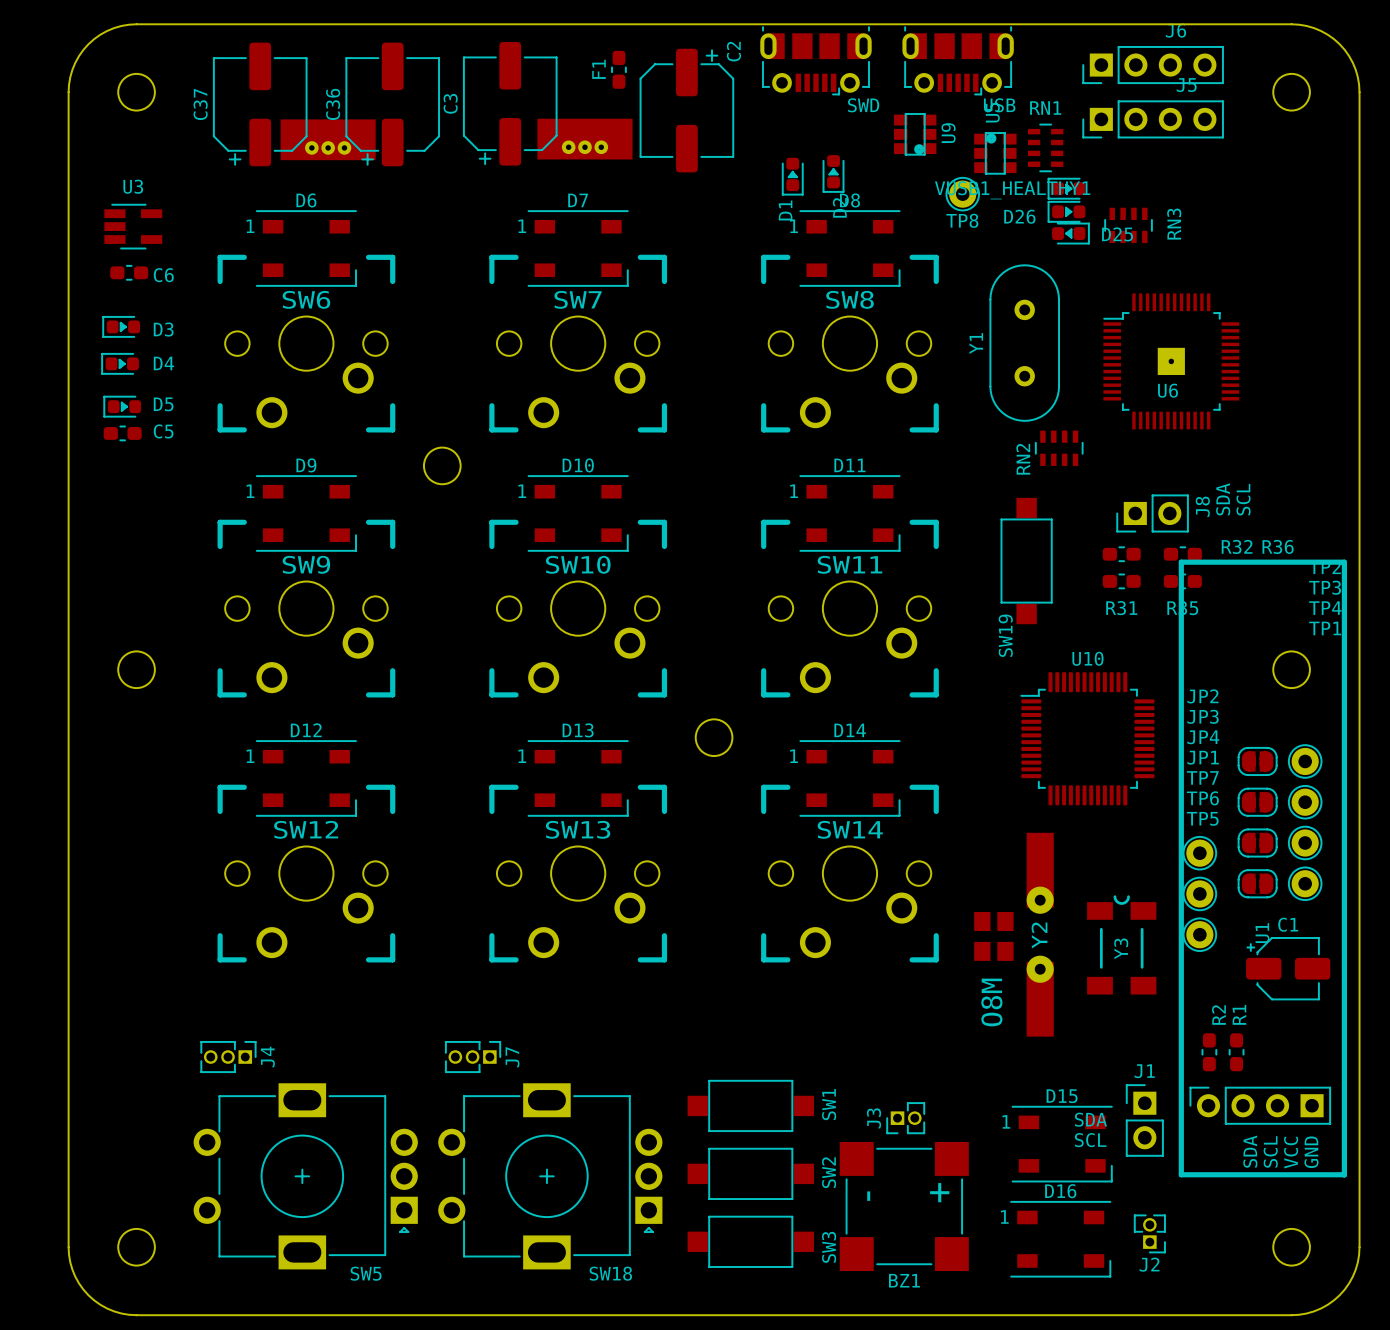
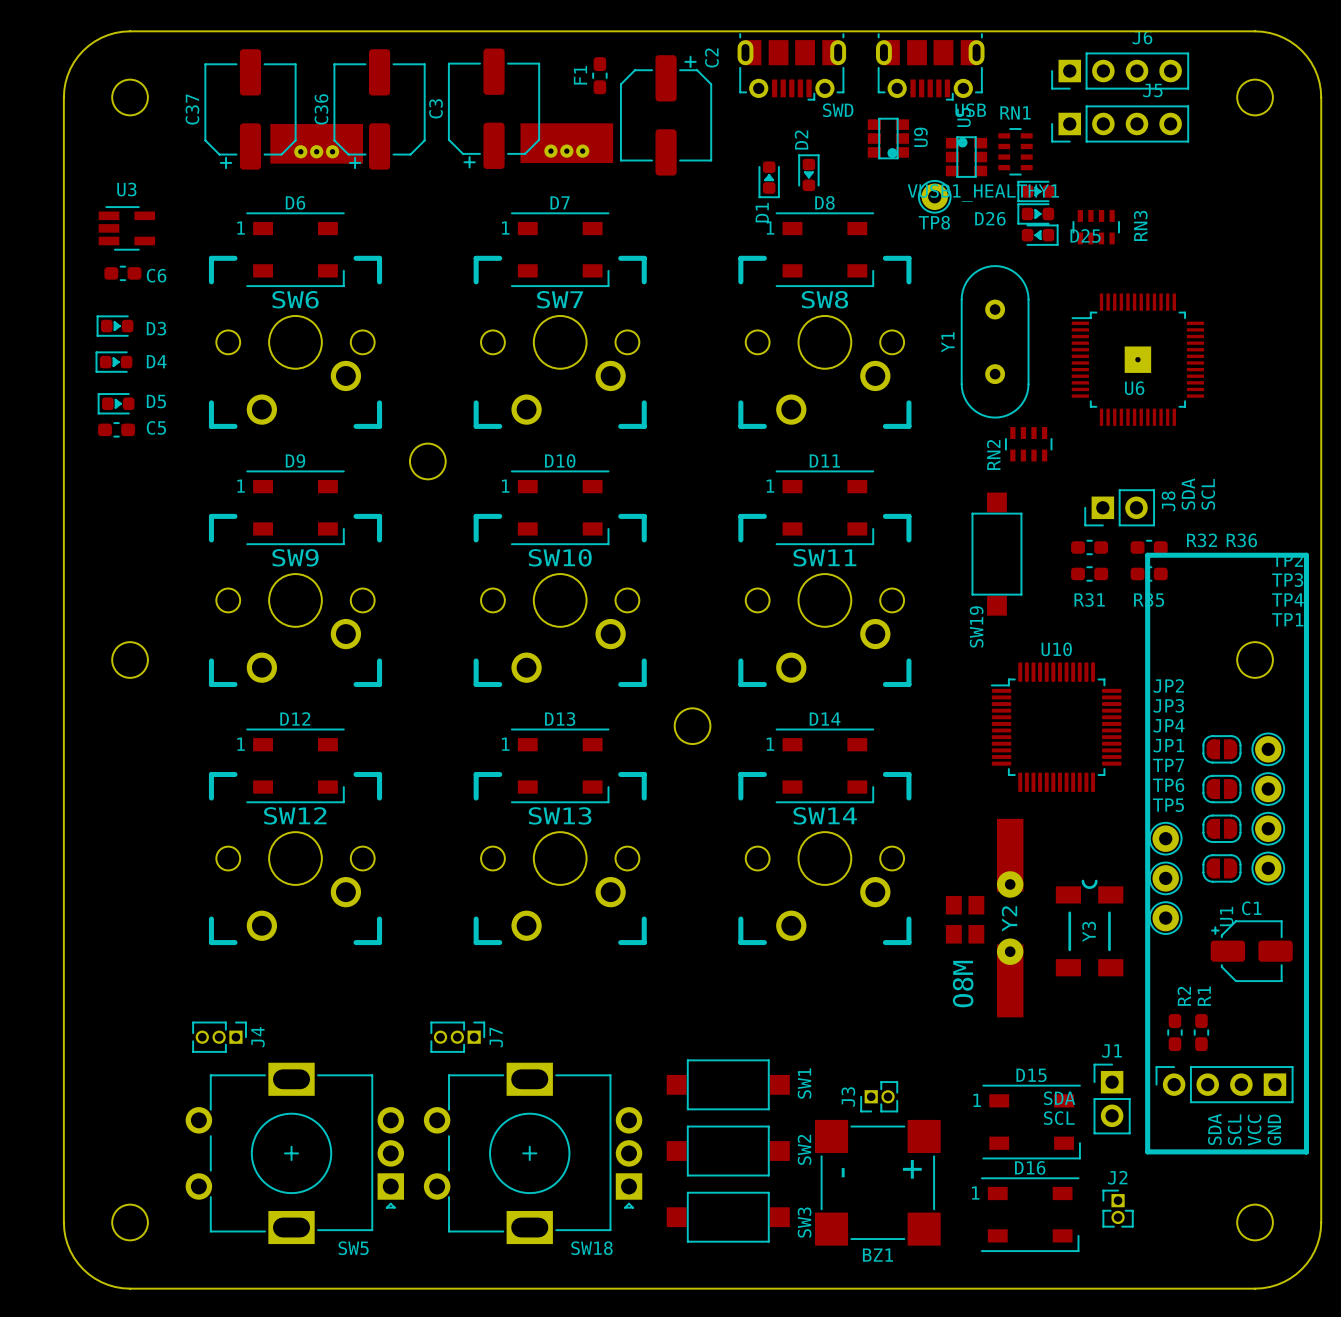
D2 rotation: 0° (833, 173) -> 180° (808, 172)
J2 rotation: 0° (1149, 1233) -> 180° (1118, 1208)

